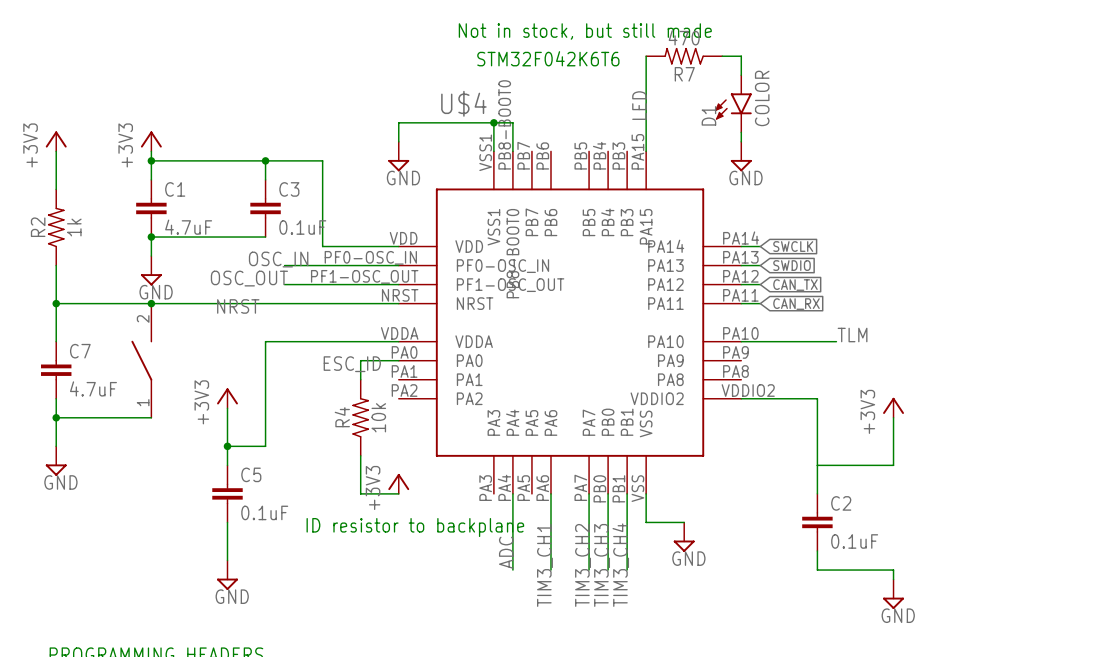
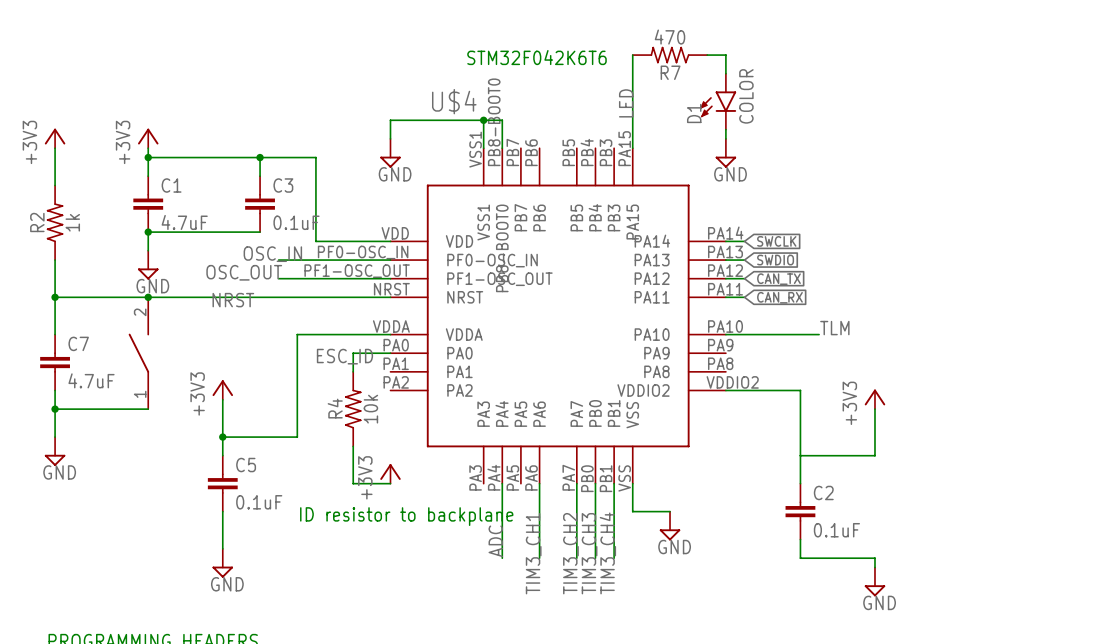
text: Not in stock, but still made (585, 31) -> none
wire: (303, 341) (265, 341) (265, 446) -> (297, 334) (297, 437) (260, 437)

